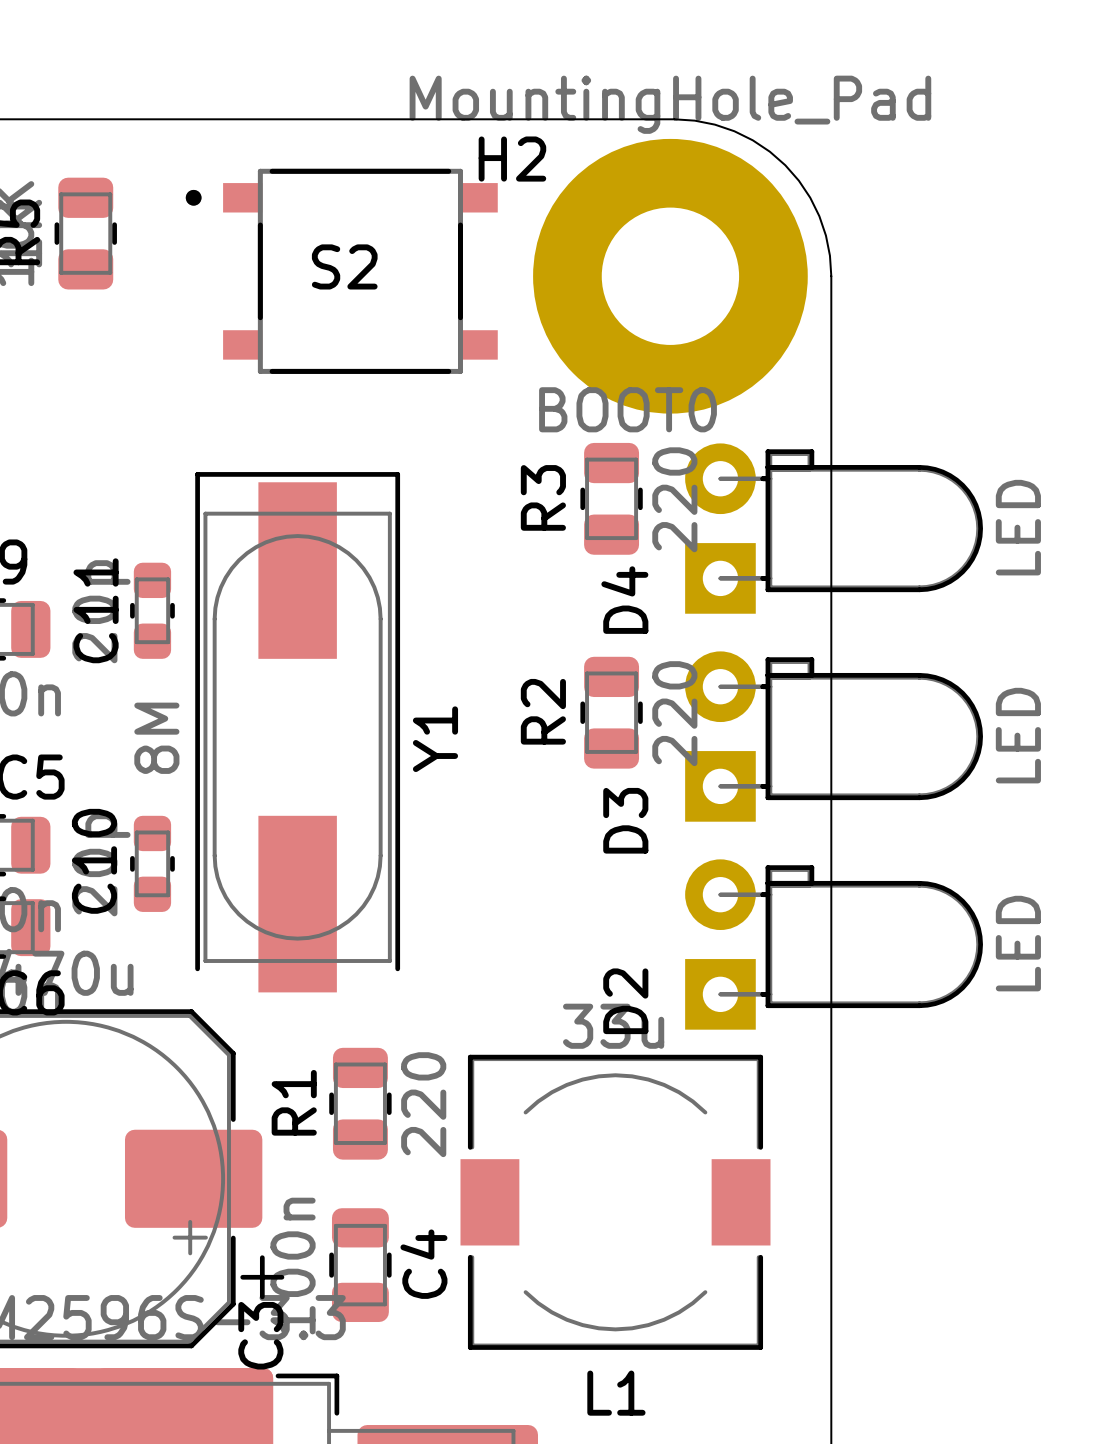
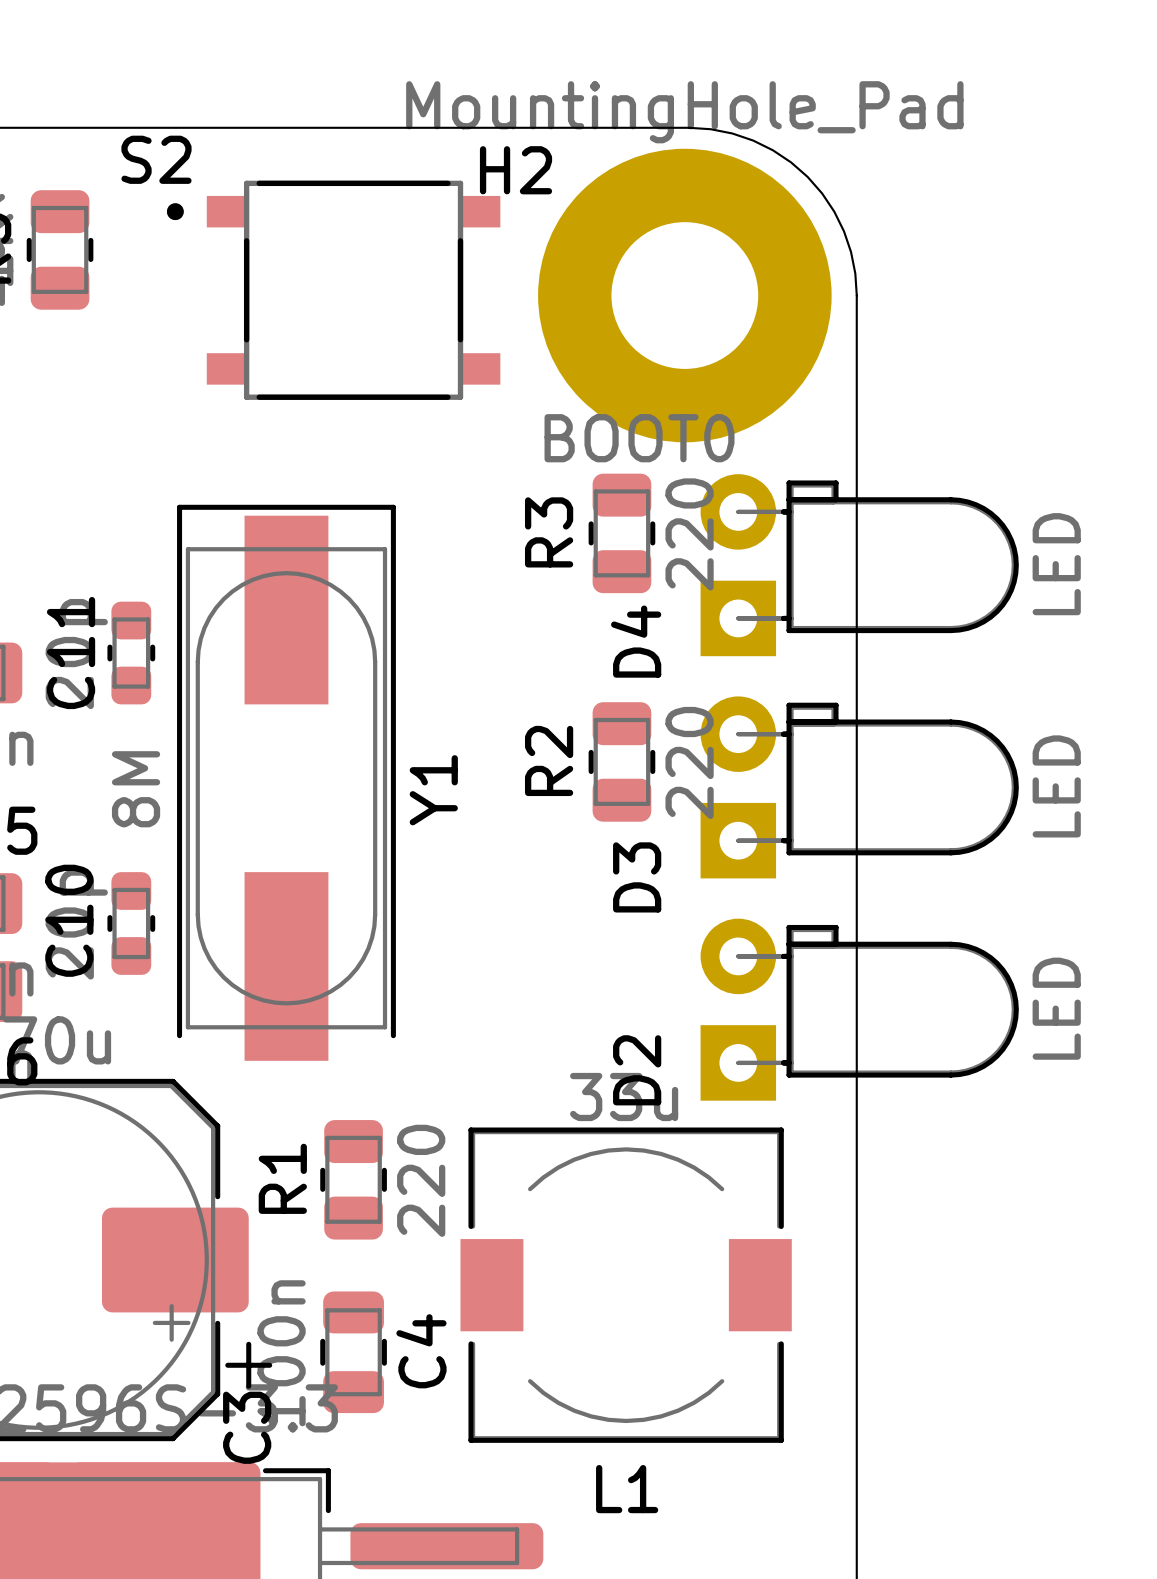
S2 name position: S2 (344, 266) -> S2 (156, 159)

